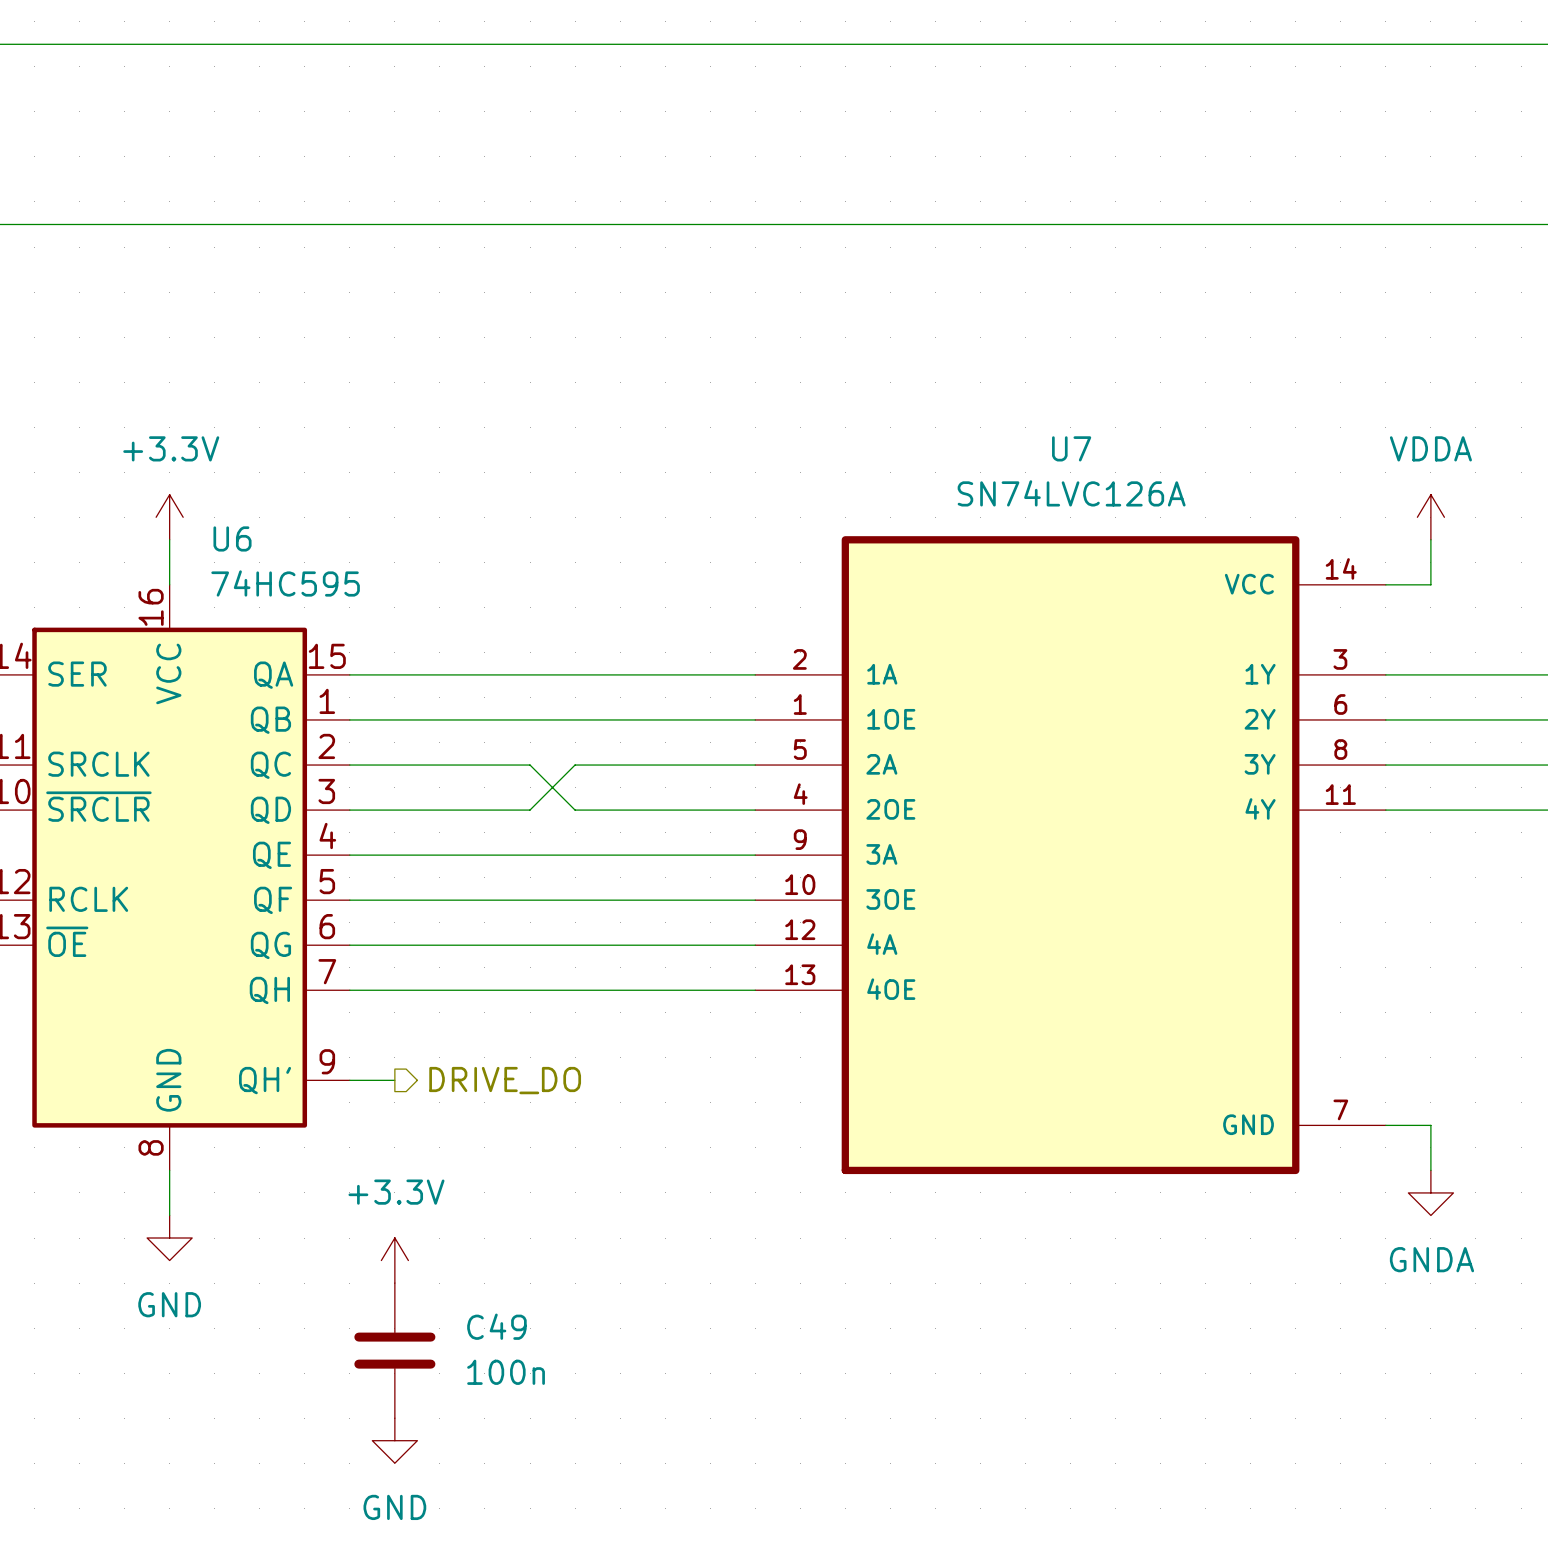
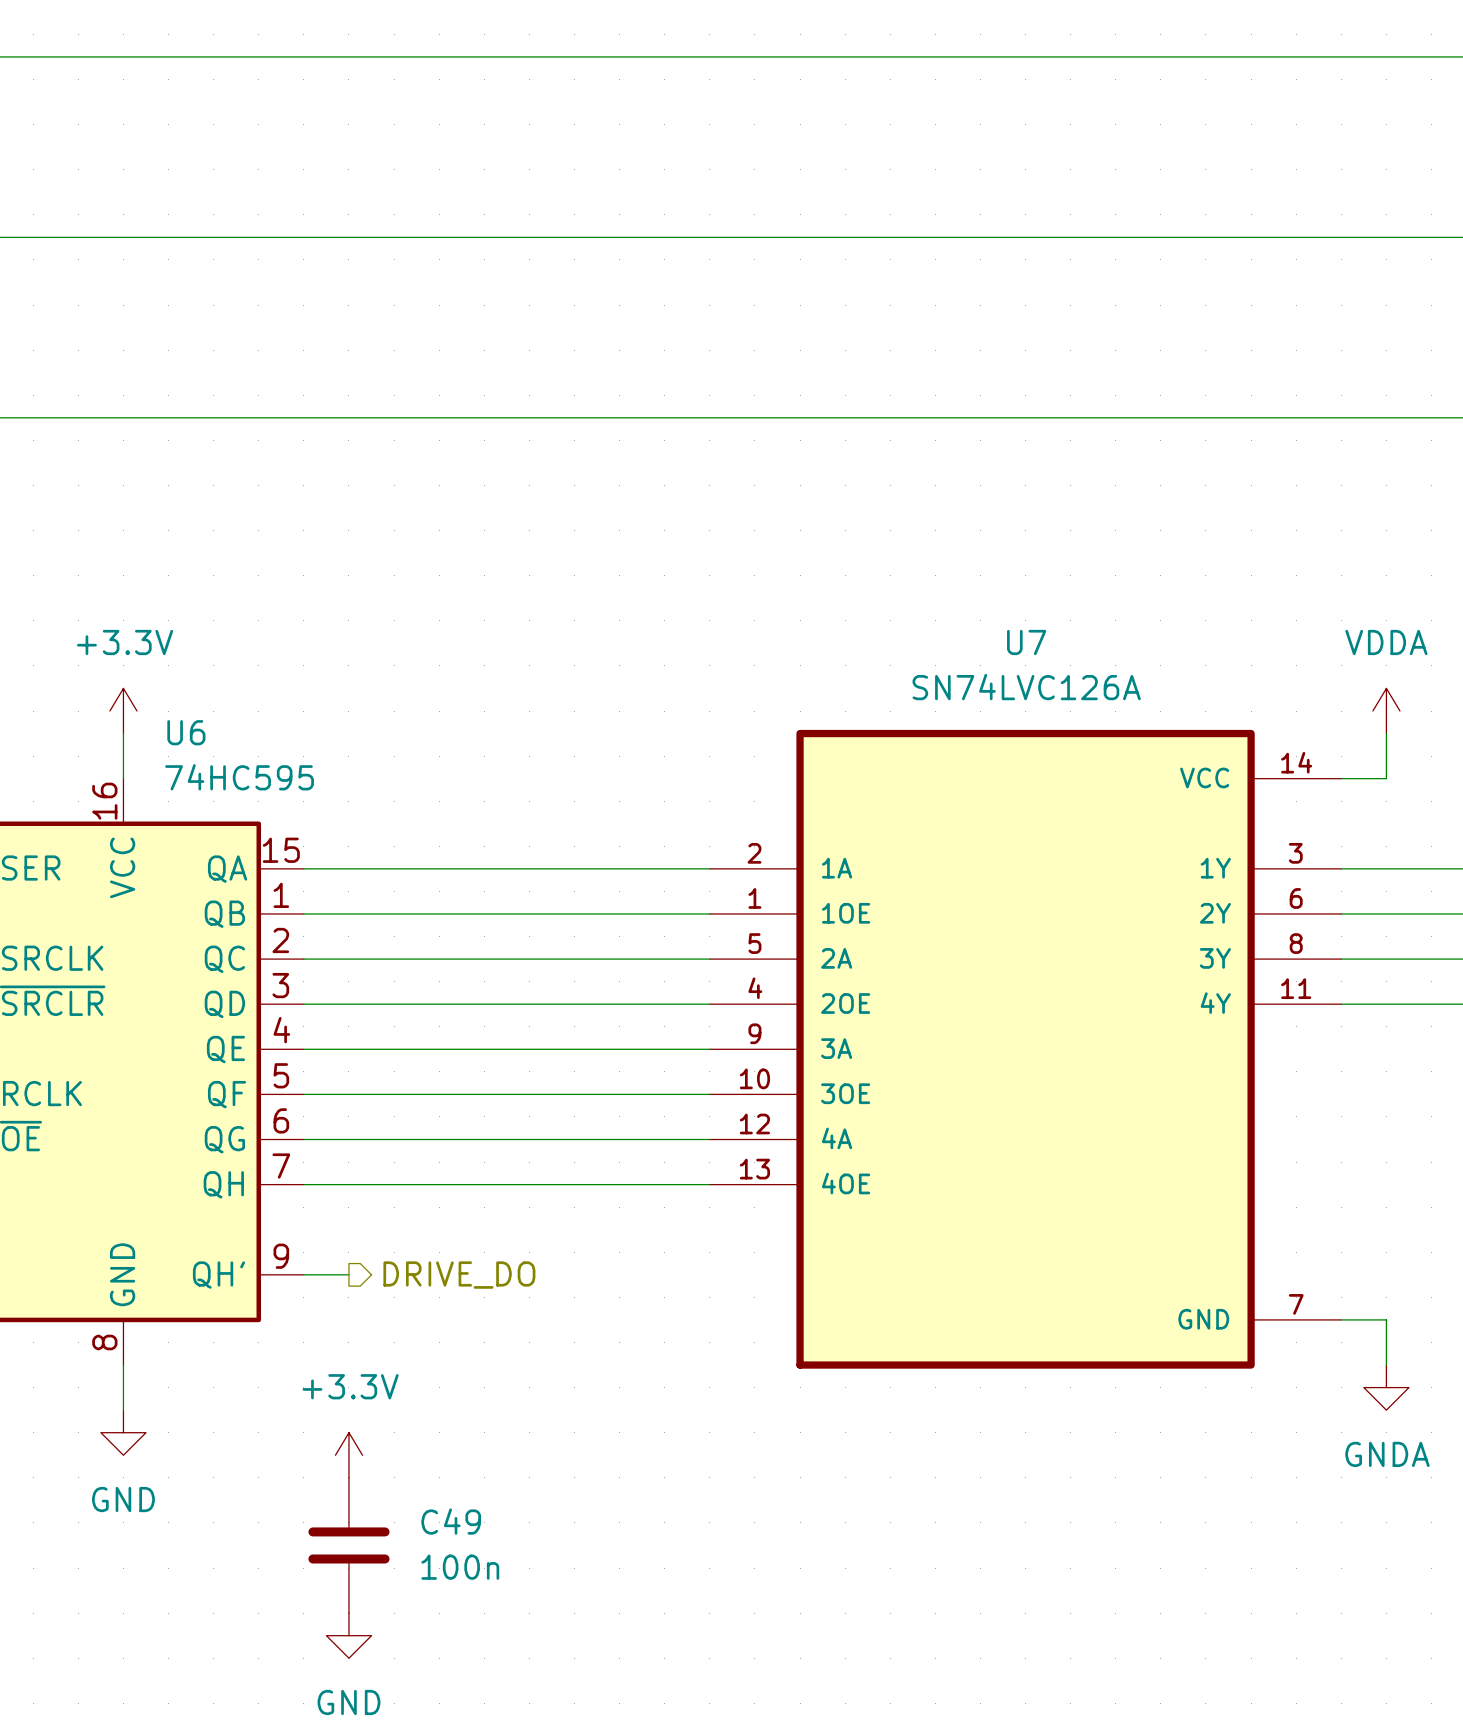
wire: (530, 765) (575, 810) -> (484, 959) (529, 959)
wire: (575, 765) (530, 810) -> (529, 1004) (484, 1004)

